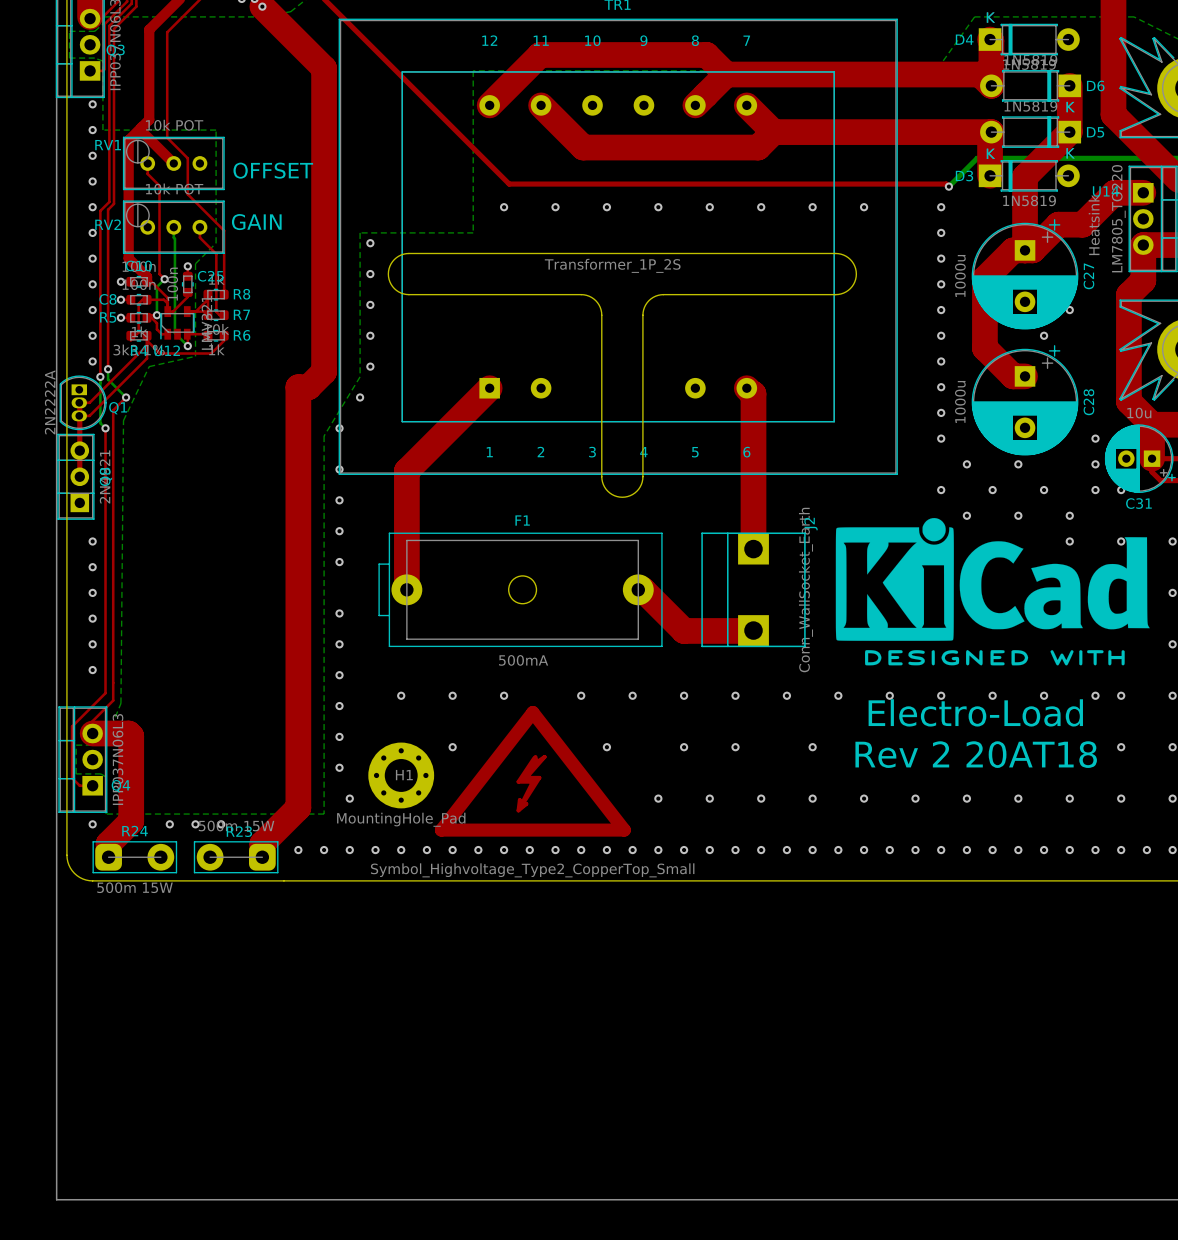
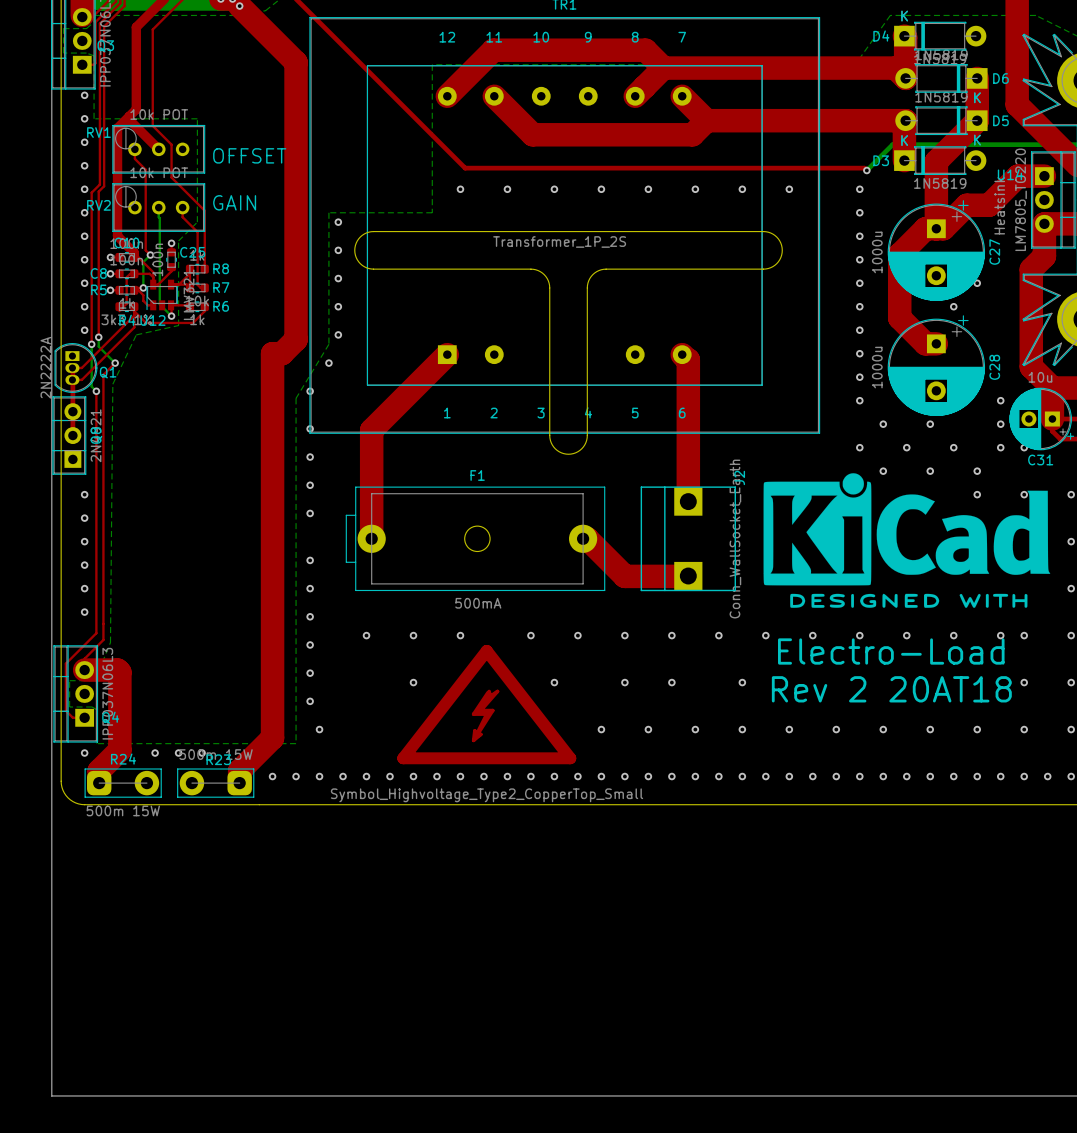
H1: MountingHole_Pad (401, 775) -> none

